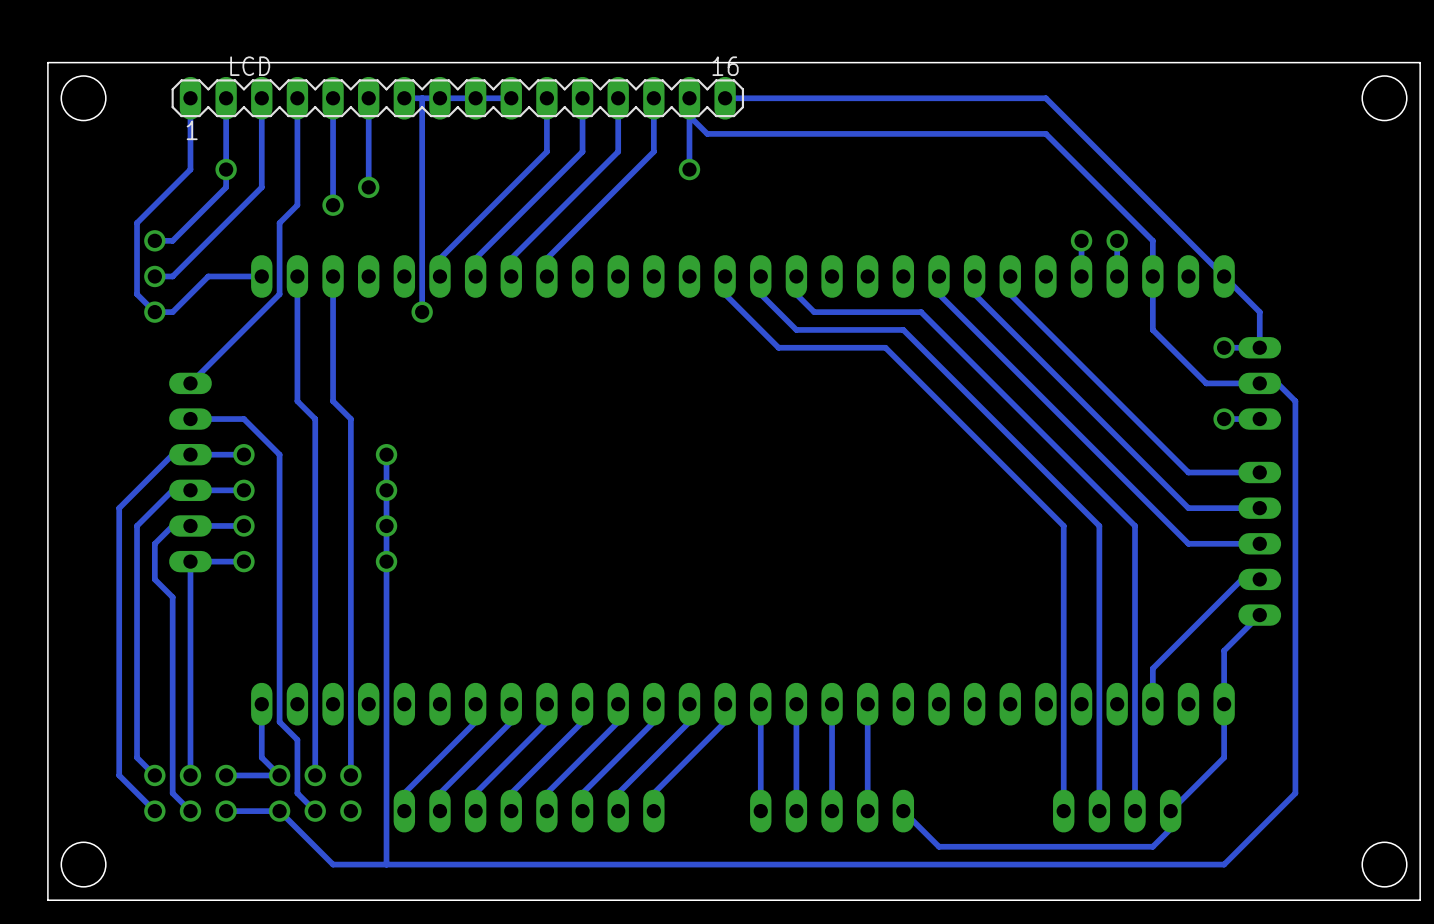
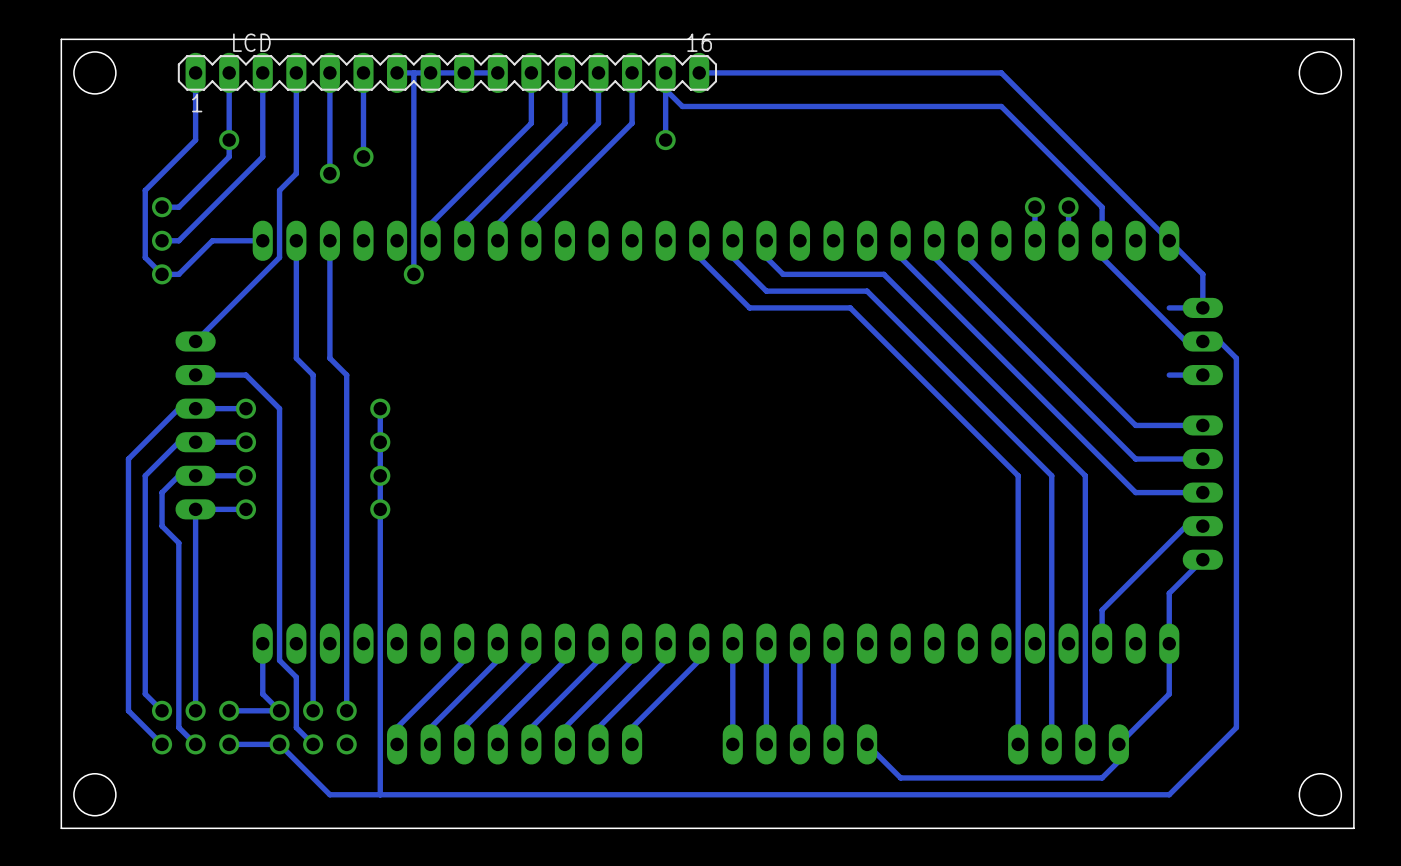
track: (1152, 294) (1152, 329) (1206, 383) (1241, 383) -> (1102, 257) (1186, 341)
via: (1224, 347) -> none
via: (1224, 419) -> none

